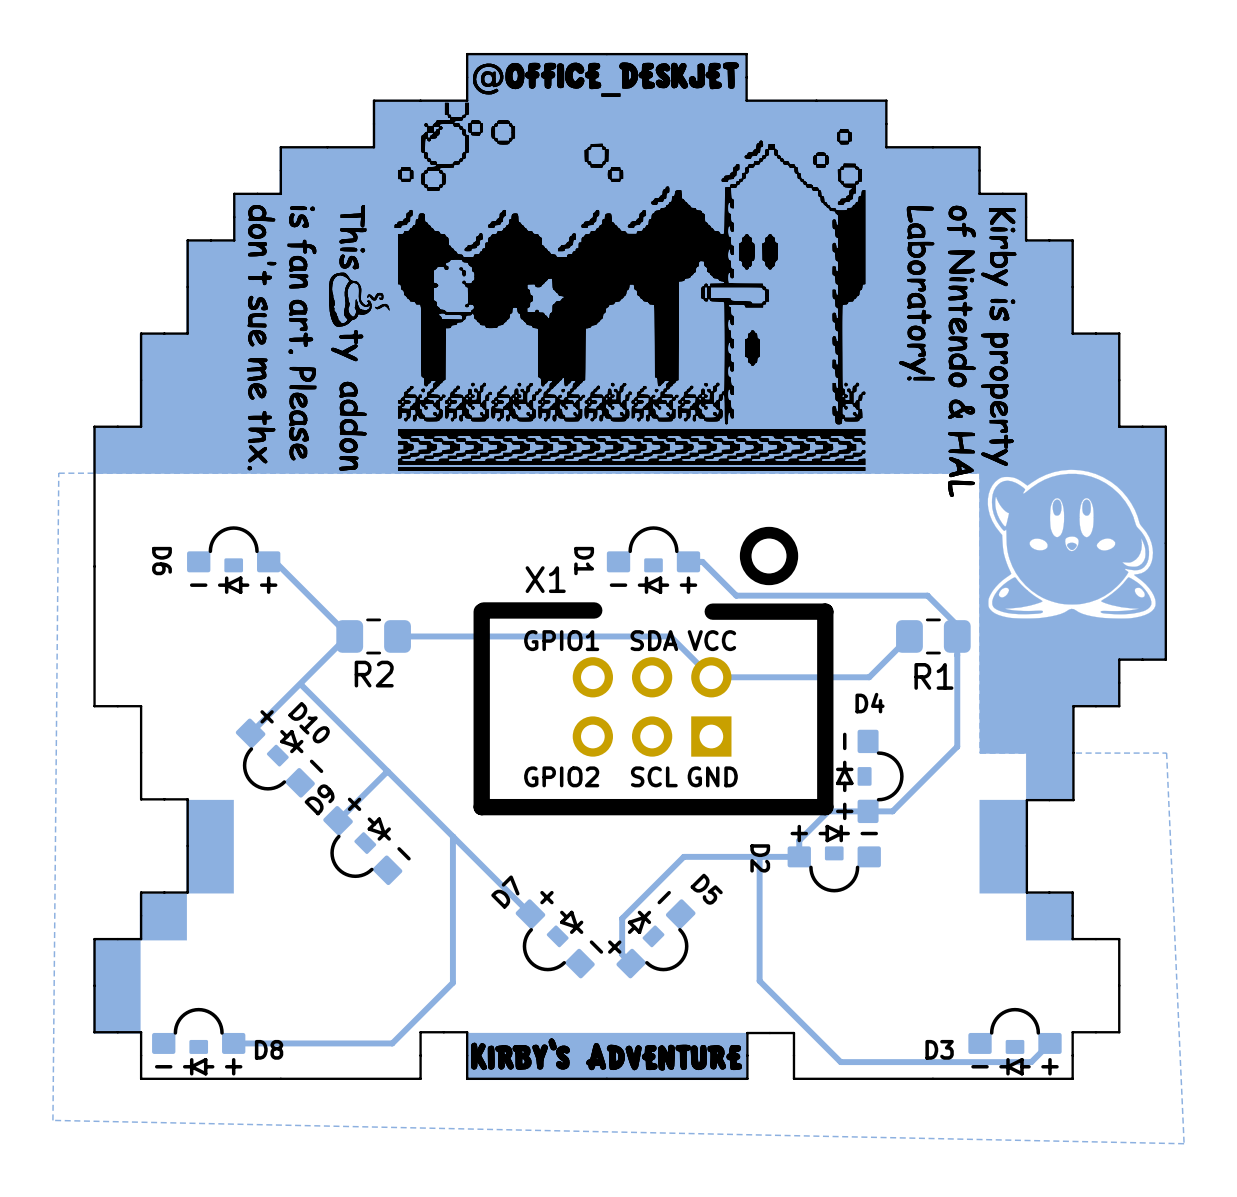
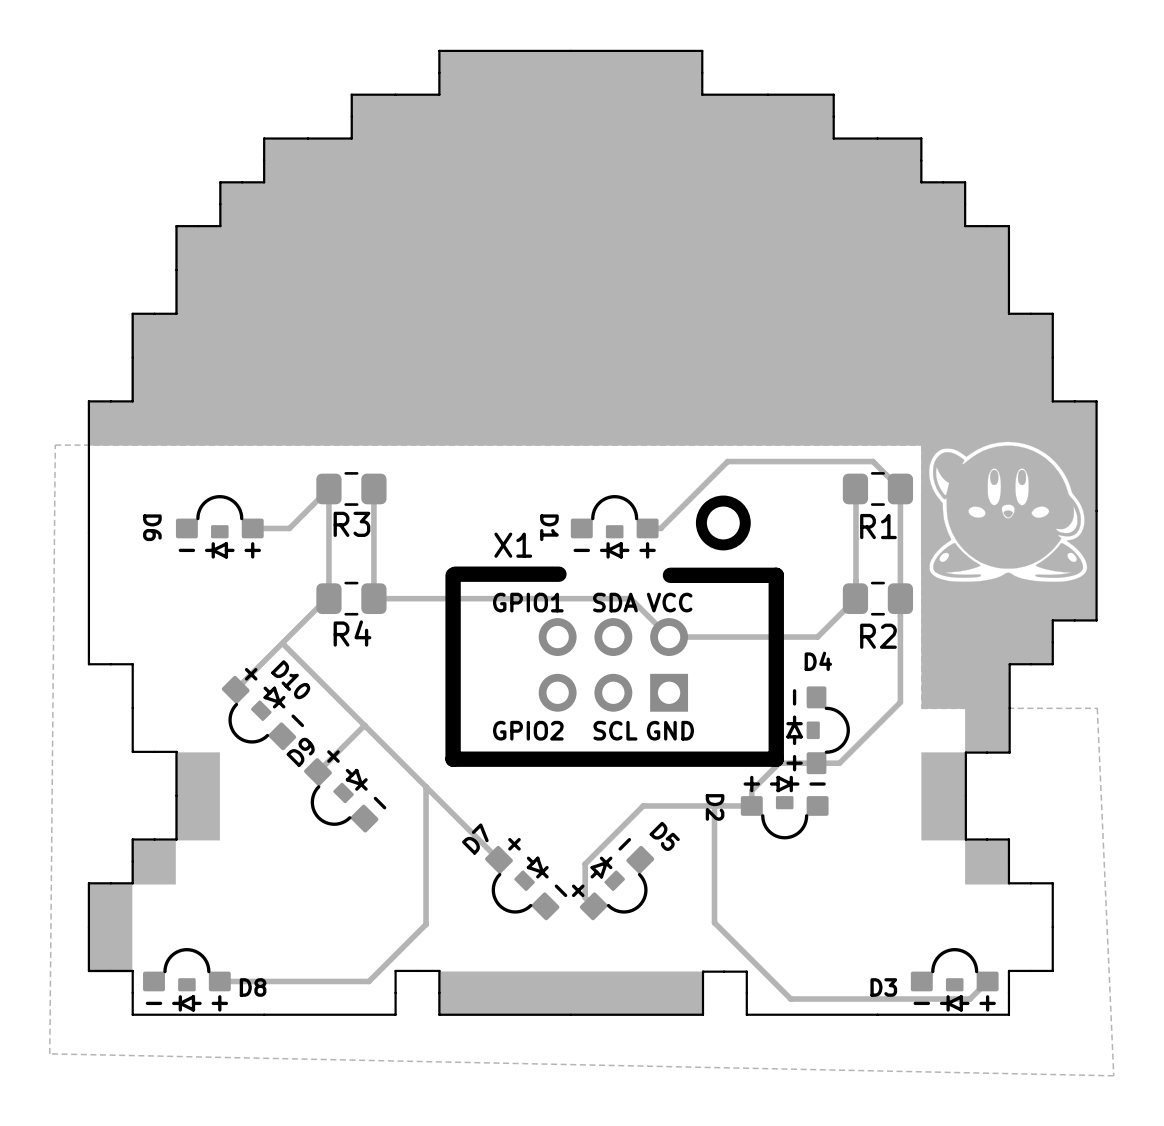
drawing: [247, 62, 1017, 1071] -> none
R3: none -> (351, 488)
track: none -> (373, 488) (373, 593)
track: none -> (855, 488) (855, 598)
R1: none -> (877, 488)
track: (275, 561) (349, 636) -> (258, 528) (289, 528) (328, 488) (328, 598)
track: (702, 561) (736, 595) (927, 595) (957, 625) -> (660, 528) (727, 461) (872, 461) (900, 488) (900, 588)
R2 name: R2 (374, 674) -> R4 (352, 633)
R1 name: R1 (933, 676) -> R2 (878, 636)

